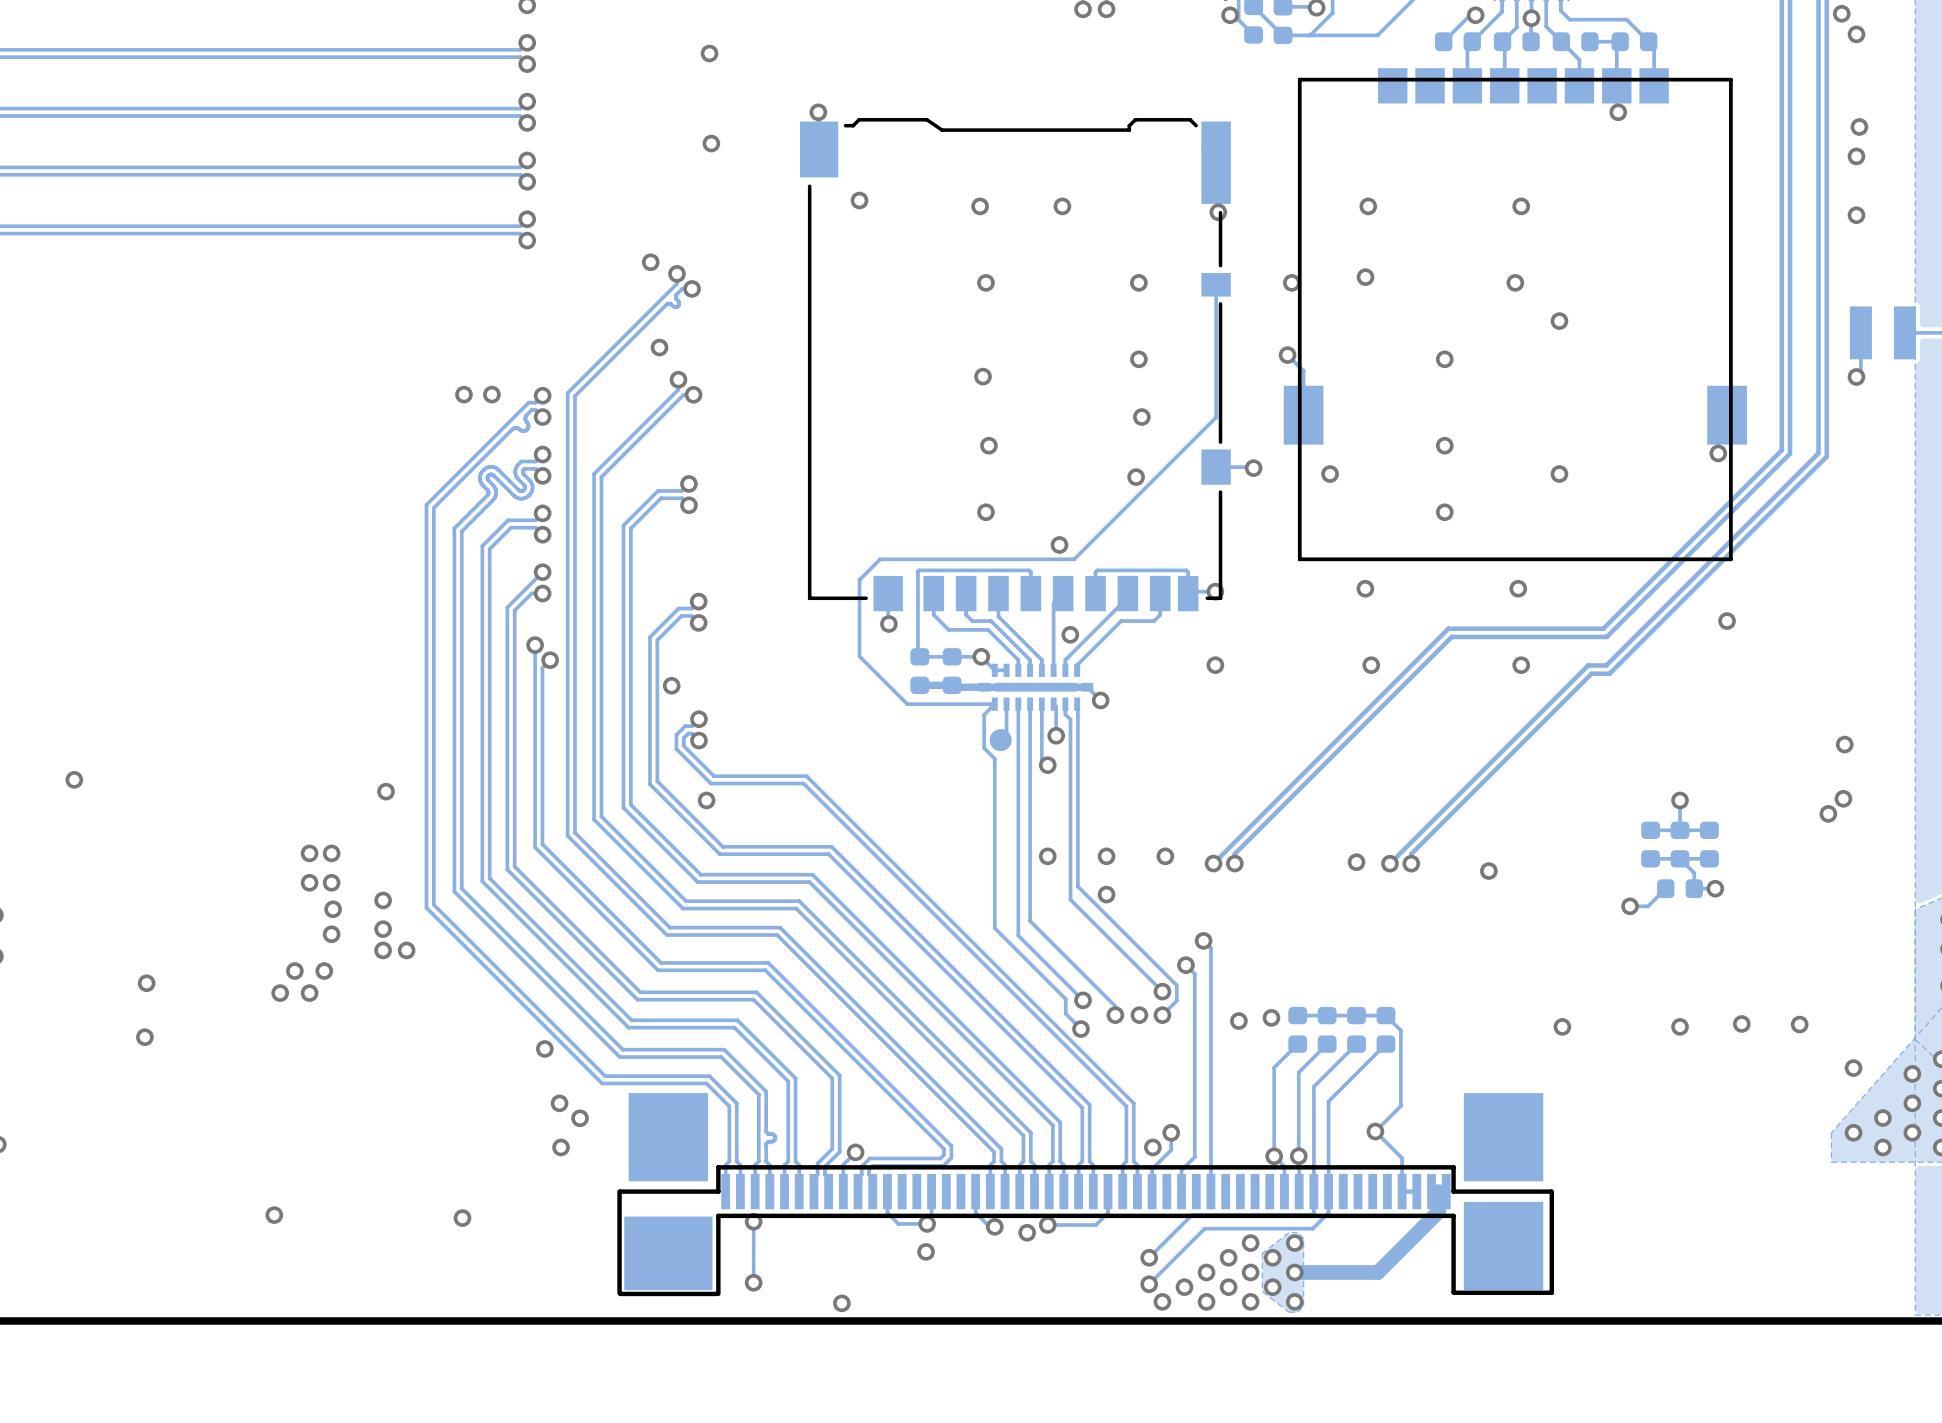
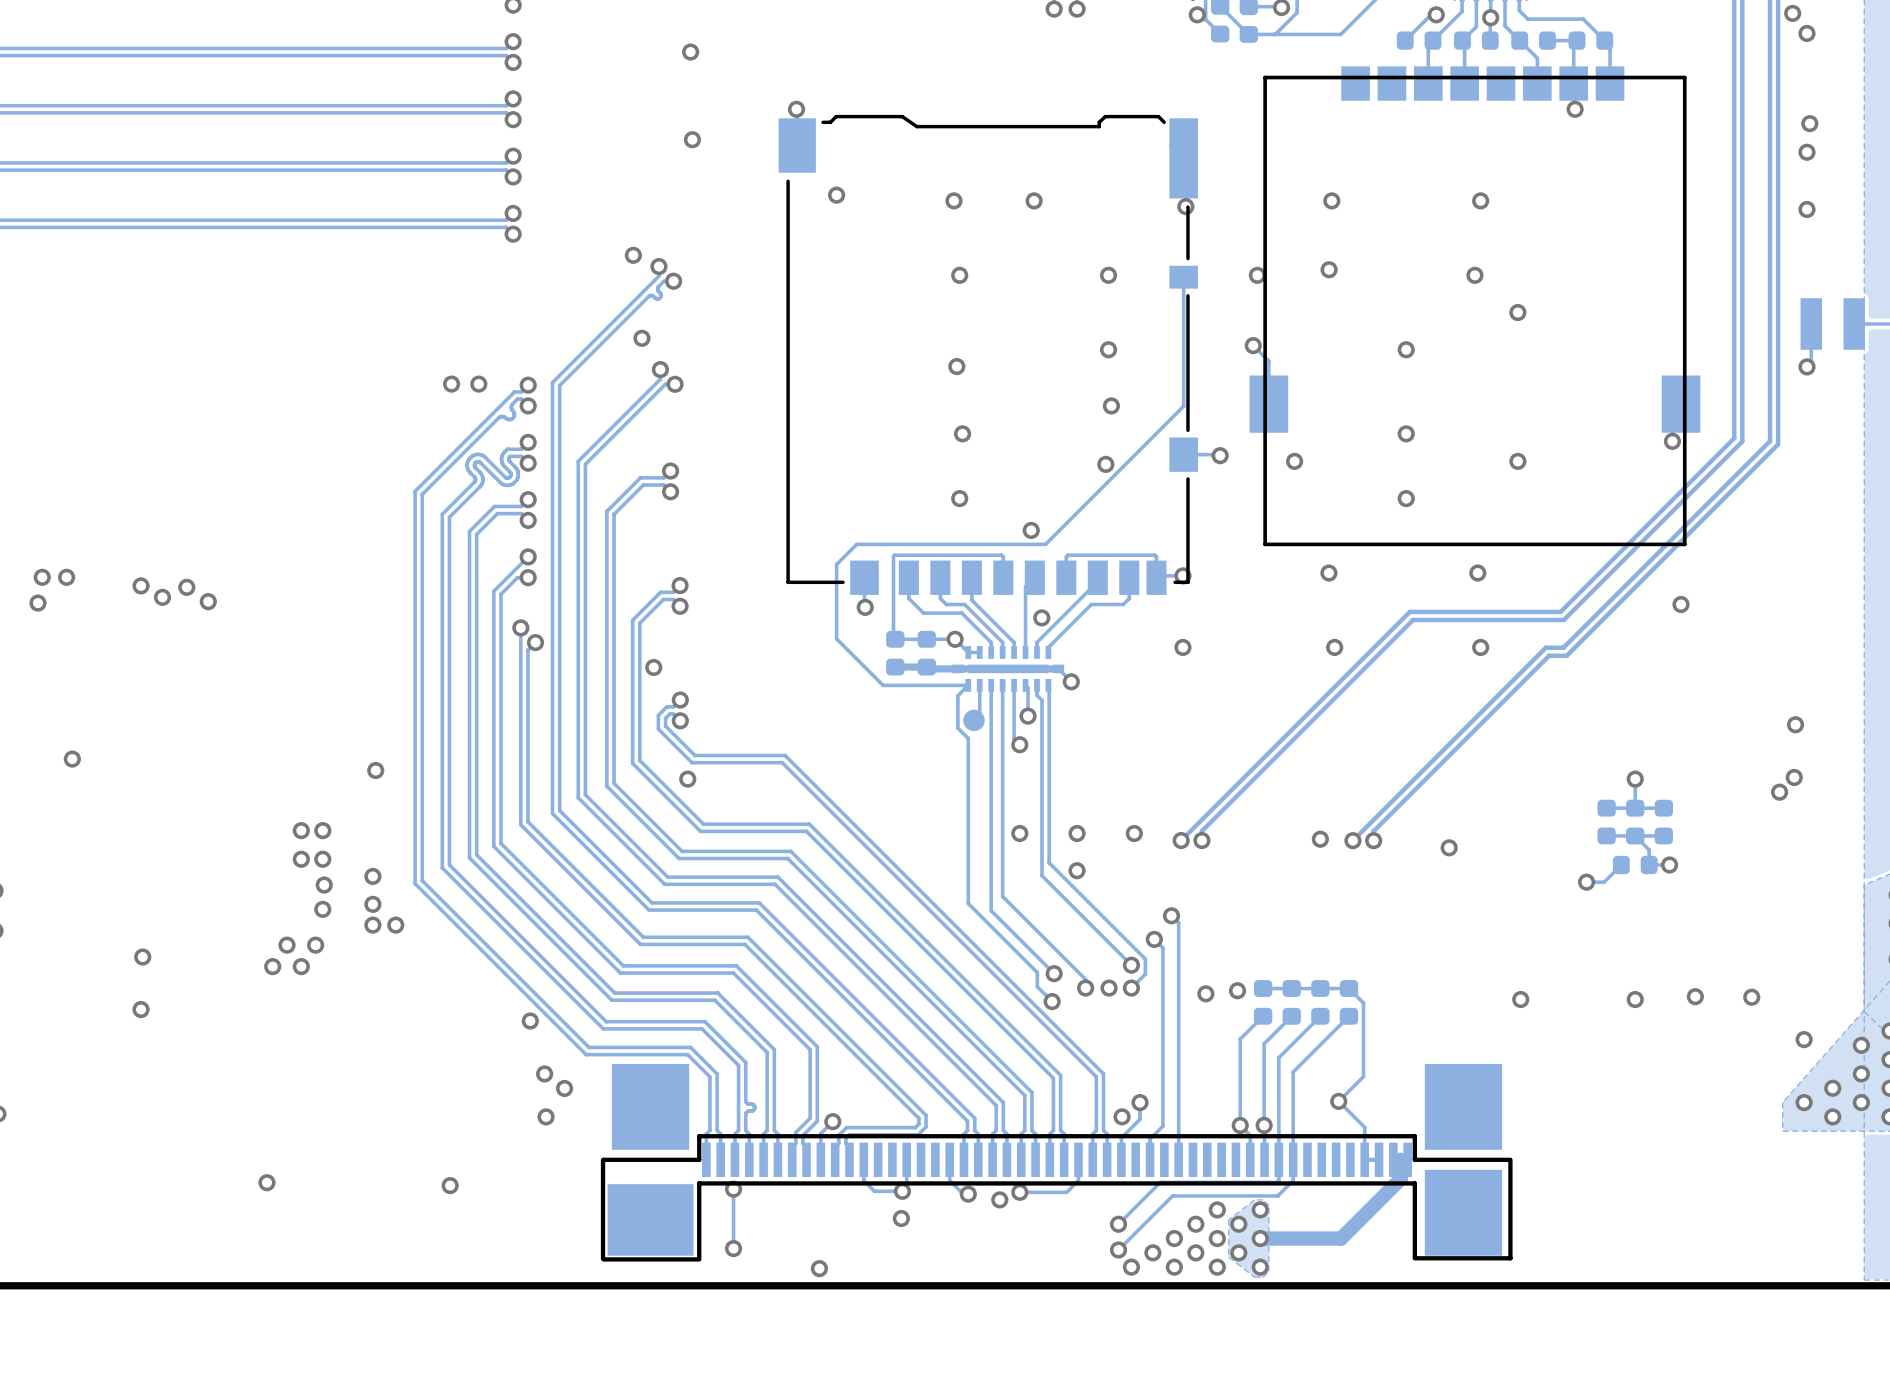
via: none -> (42, 577)
via: none -> (66, 577)
via: none -> (141, 585)
via: none -> (186, 587)
via: none -> (162, 597)
via: none -> (208, 601)
via: none -> (37, 603)

